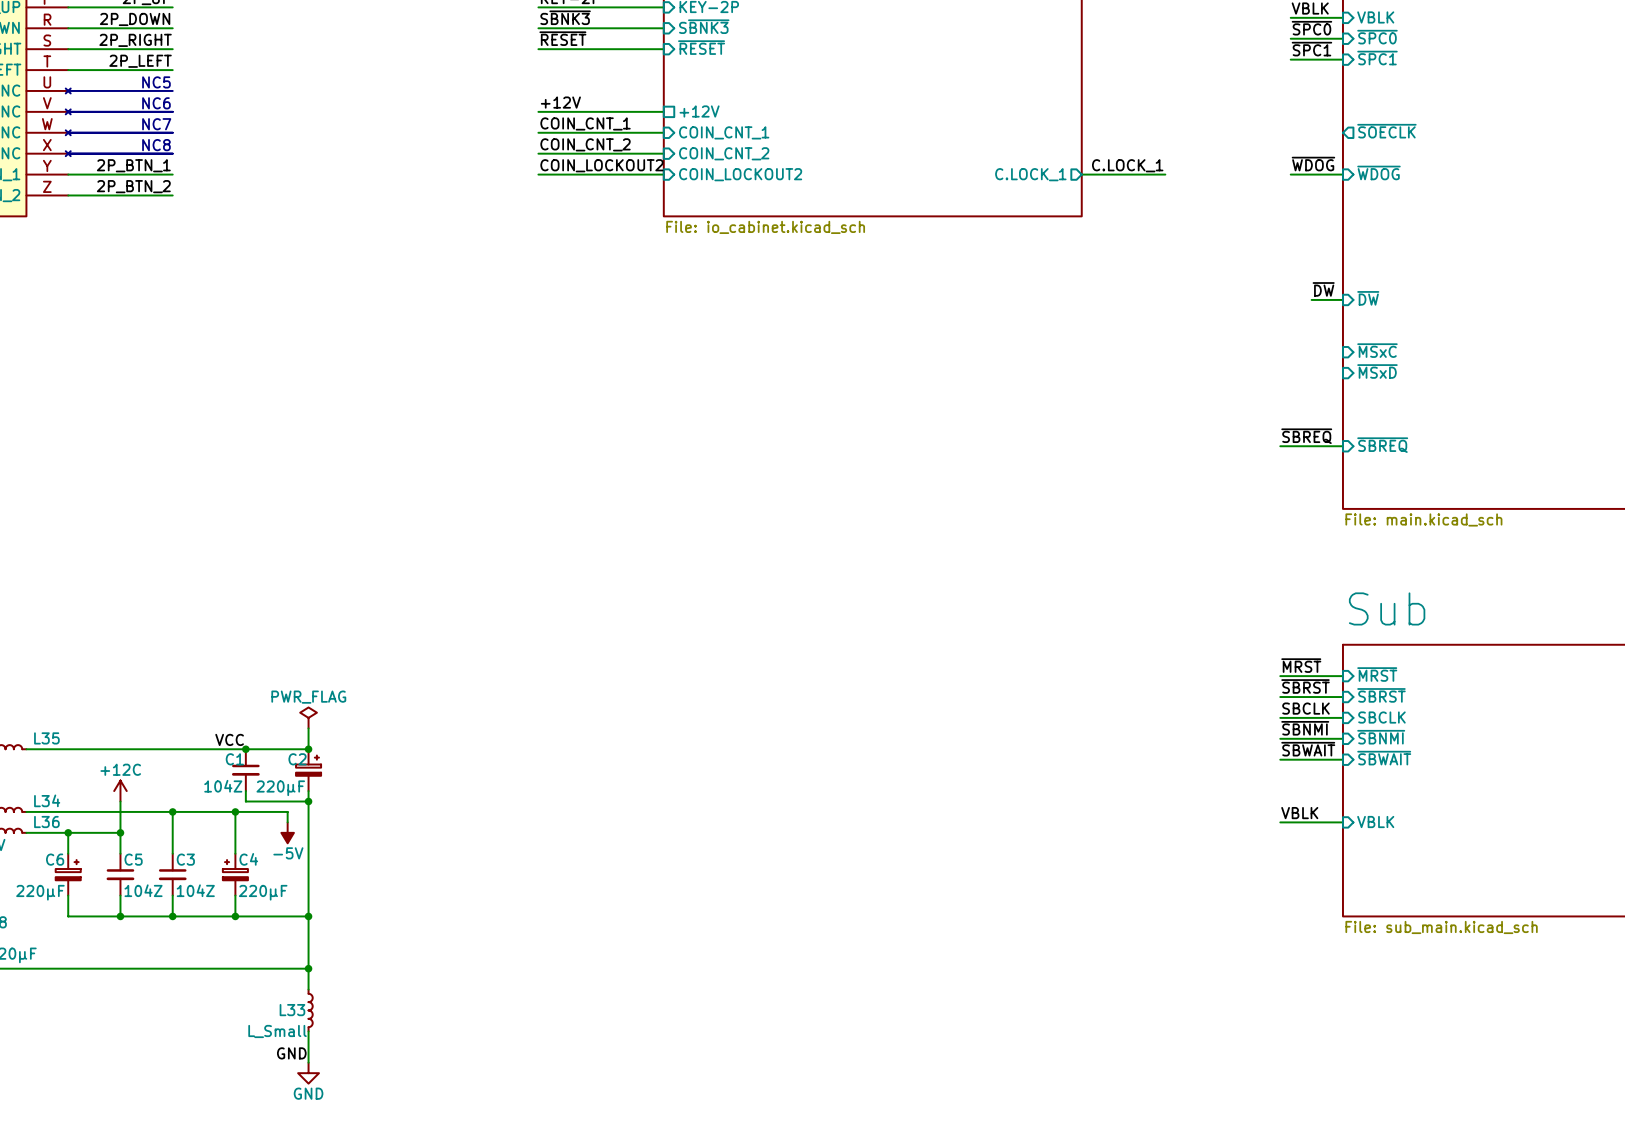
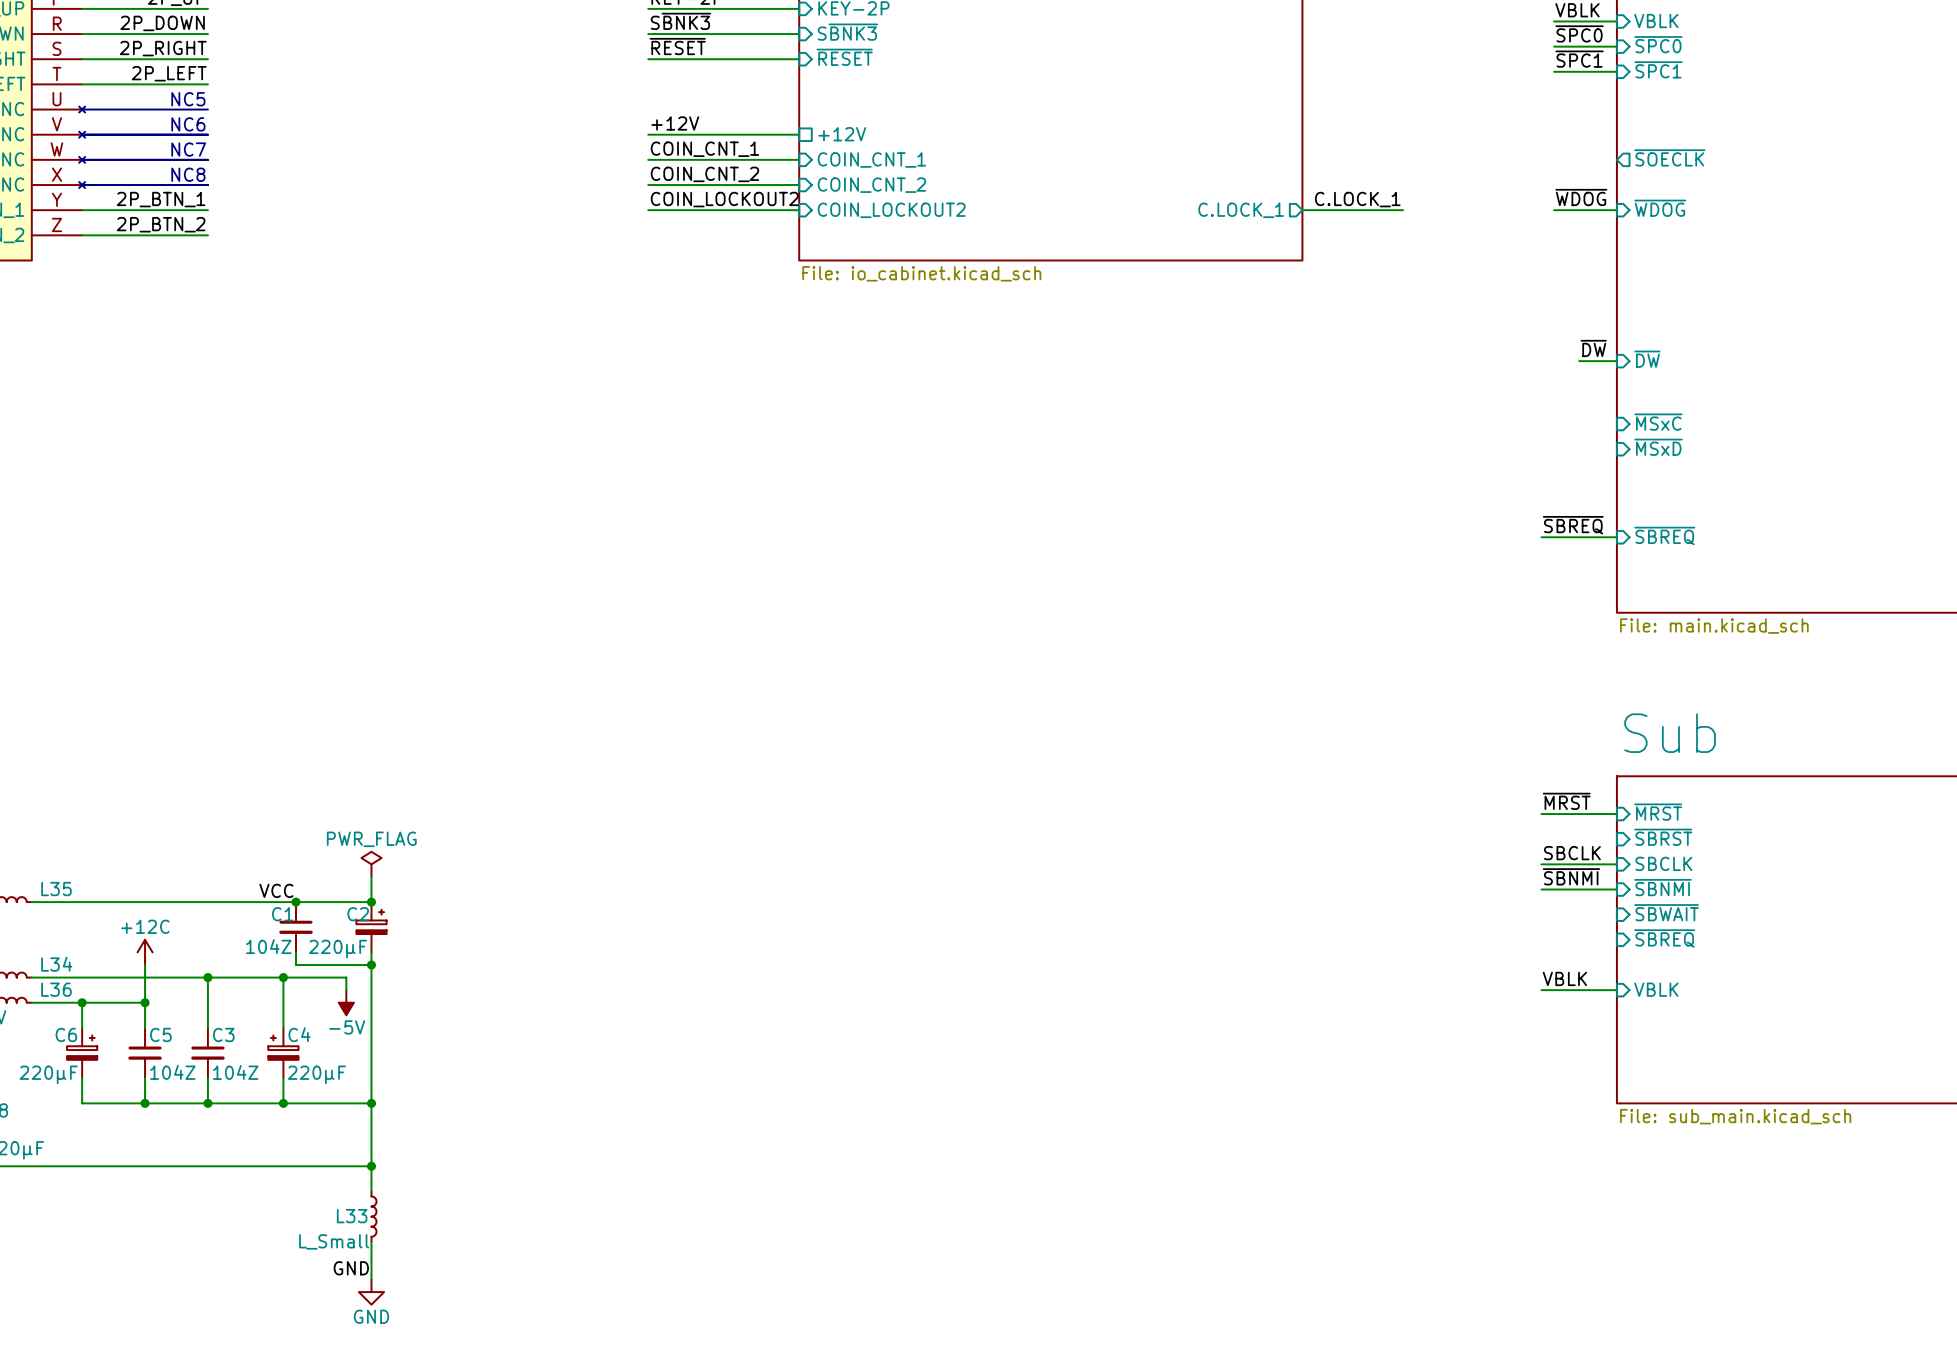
label: ~{SBRST} (1305, 686) -> none
wire: (1280, 697) (1342, 697) -> none
label: ~{SBWAIT} (1308, 749) -> none
wire: (1280, 759) (1342, 759) -> none
sheet pin: none -> ~{SBREQ} (1664, 938)

